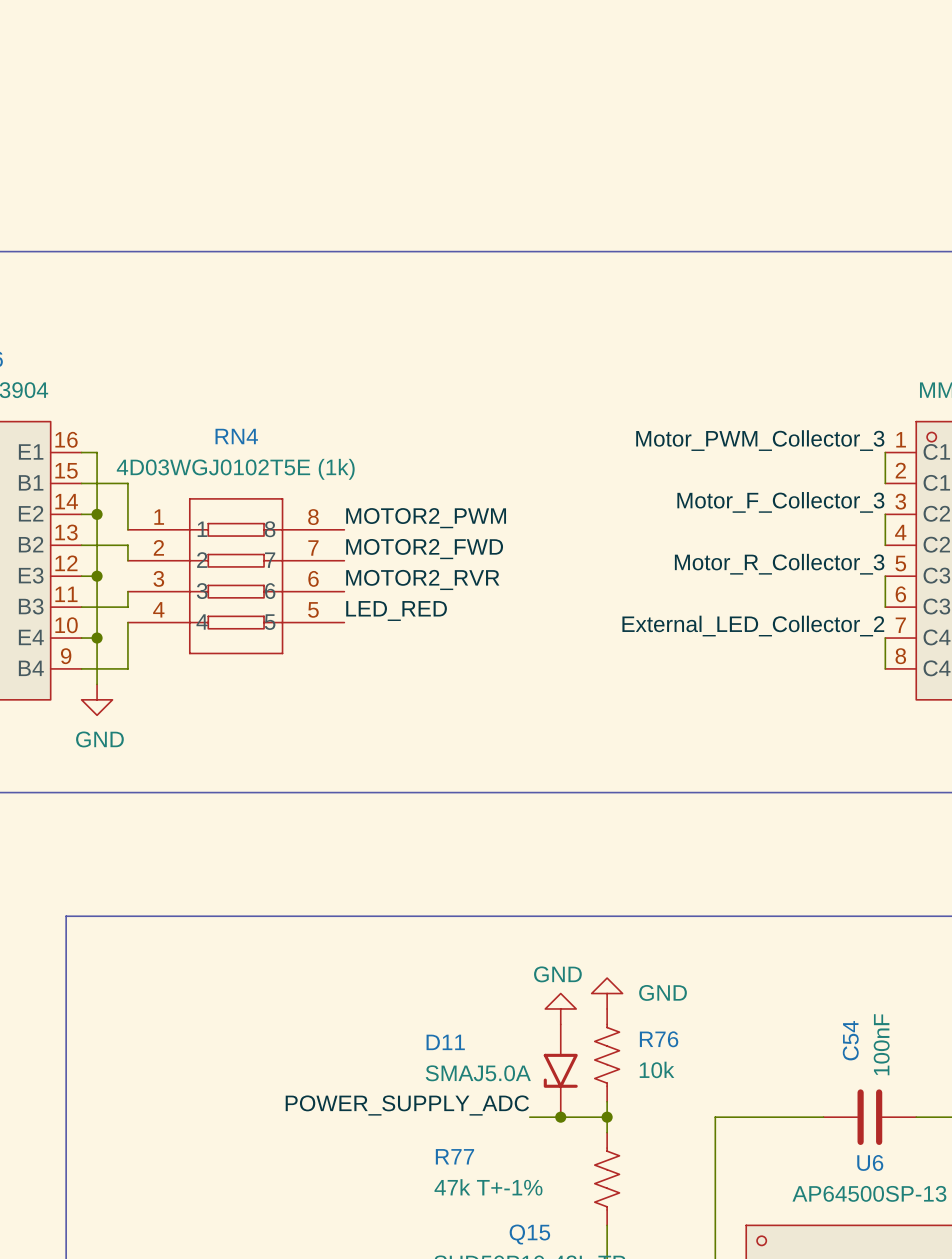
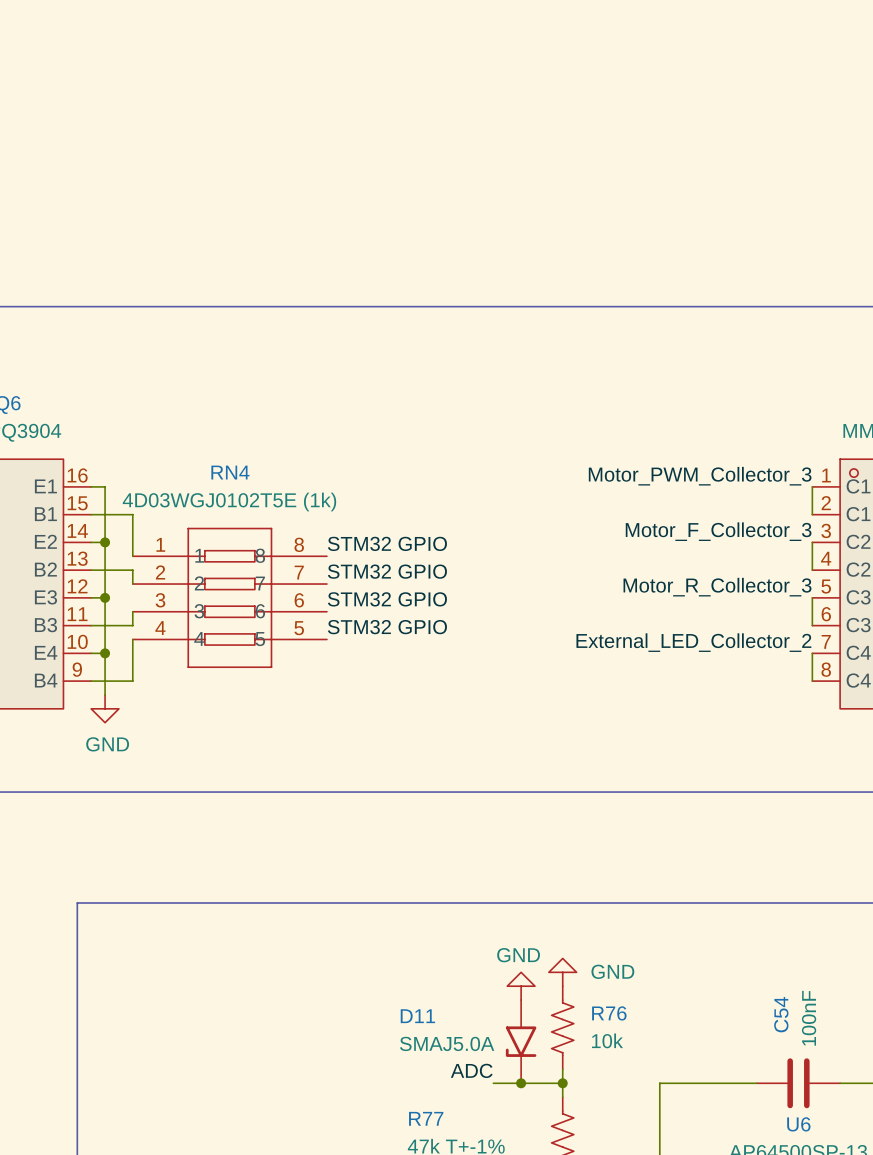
label: MOTOR2_PWM (426, 518) -> STM32 GPIO (387, 543)
label: MOTOR2_FWD (424, 549) -> STM32 GPIO (387, 571)
label: MOTOR2_RVR (422, 579) -> STM32 GPIO (387, 599)
label: LED_RED (396, 611) -> STM32 GPIO (387, 627)
label: POWER_SUPPLY_ADC (407, 1105) -> ADC (471, 1070)

